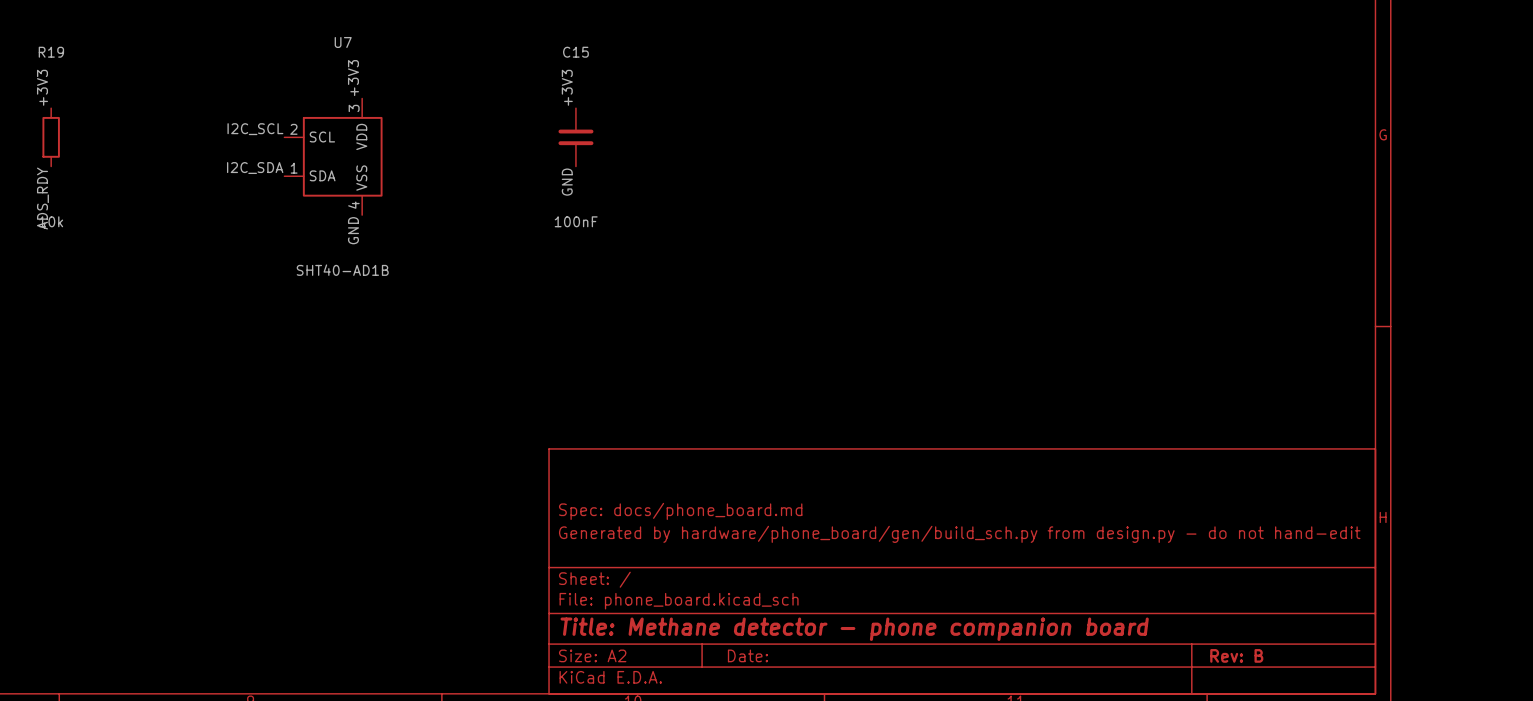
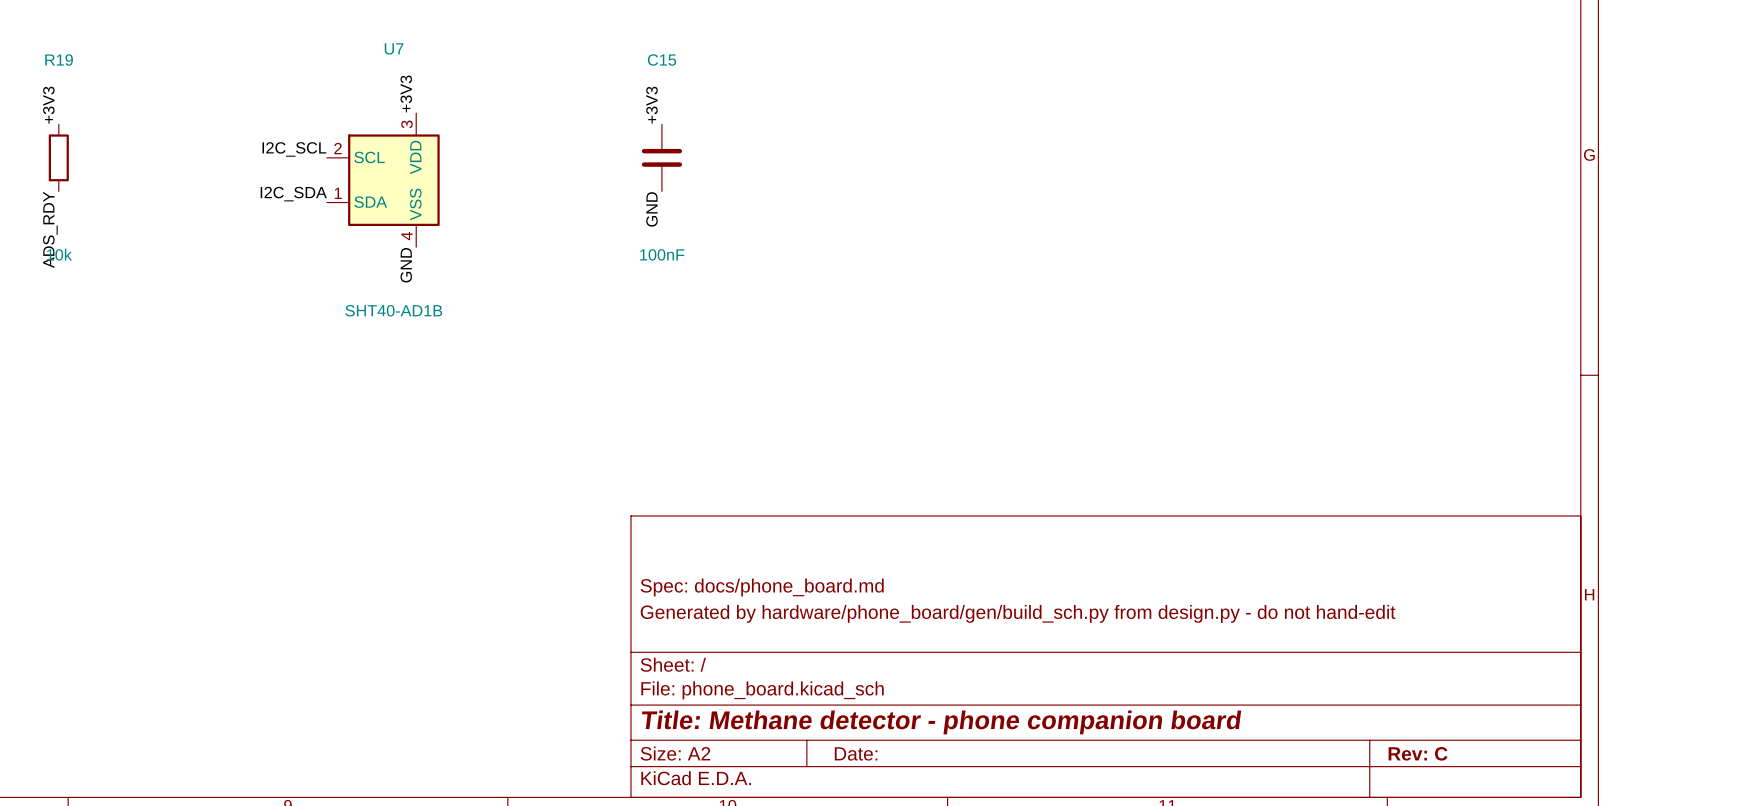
title block: Rev: B (1236, 655) -> Rev: C (1418, 753)

